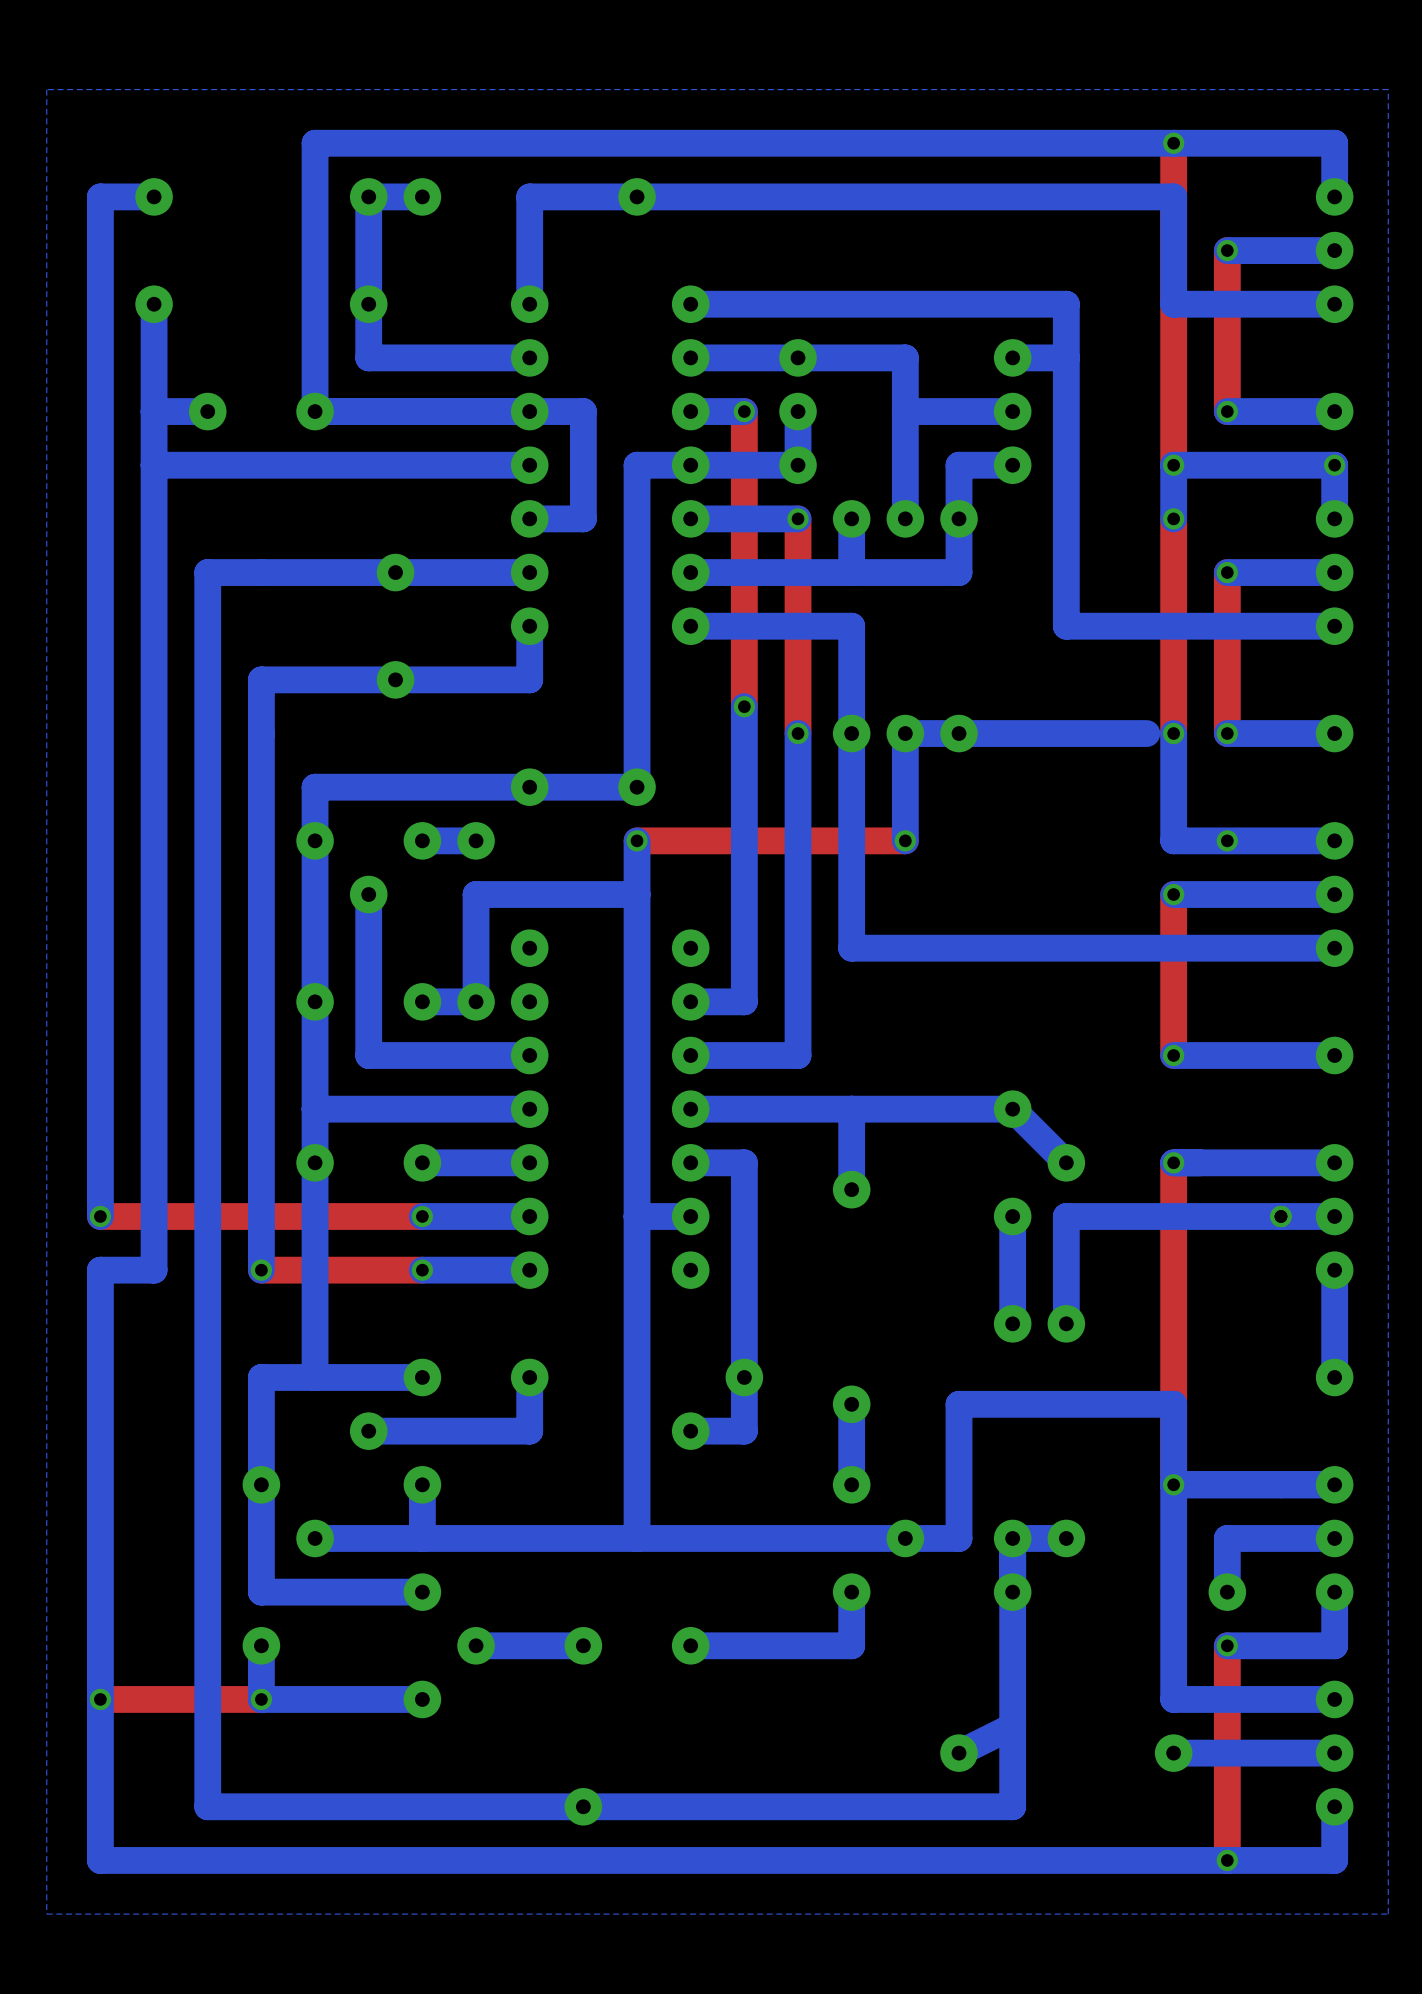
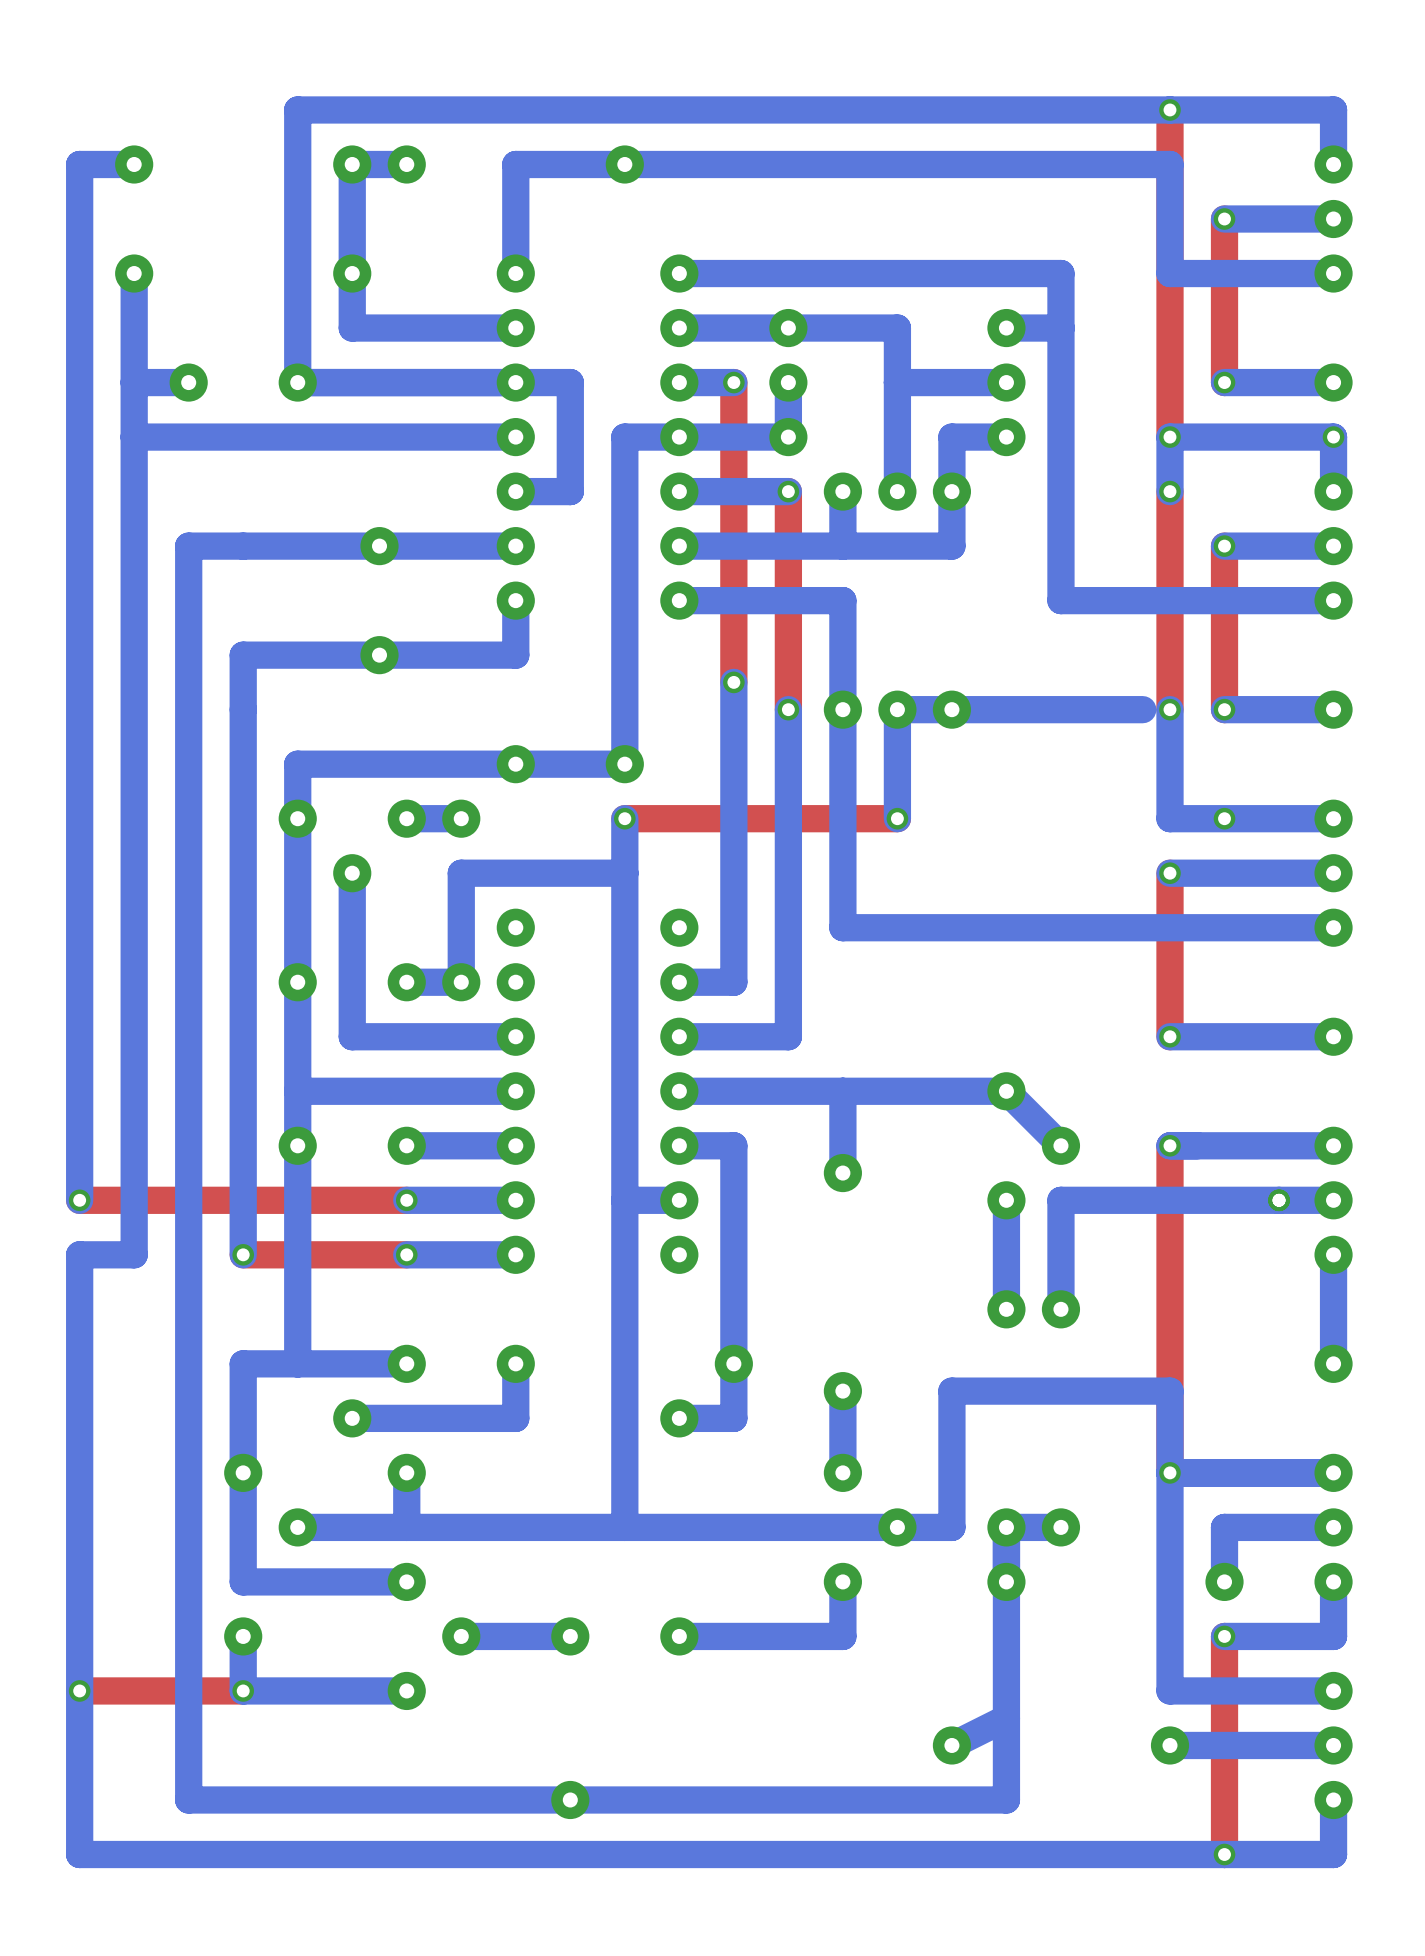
bottom zone outline: (1388, 89) (46, 89) (46, 1914) (1388, 1914) (1388, 89) -> none

